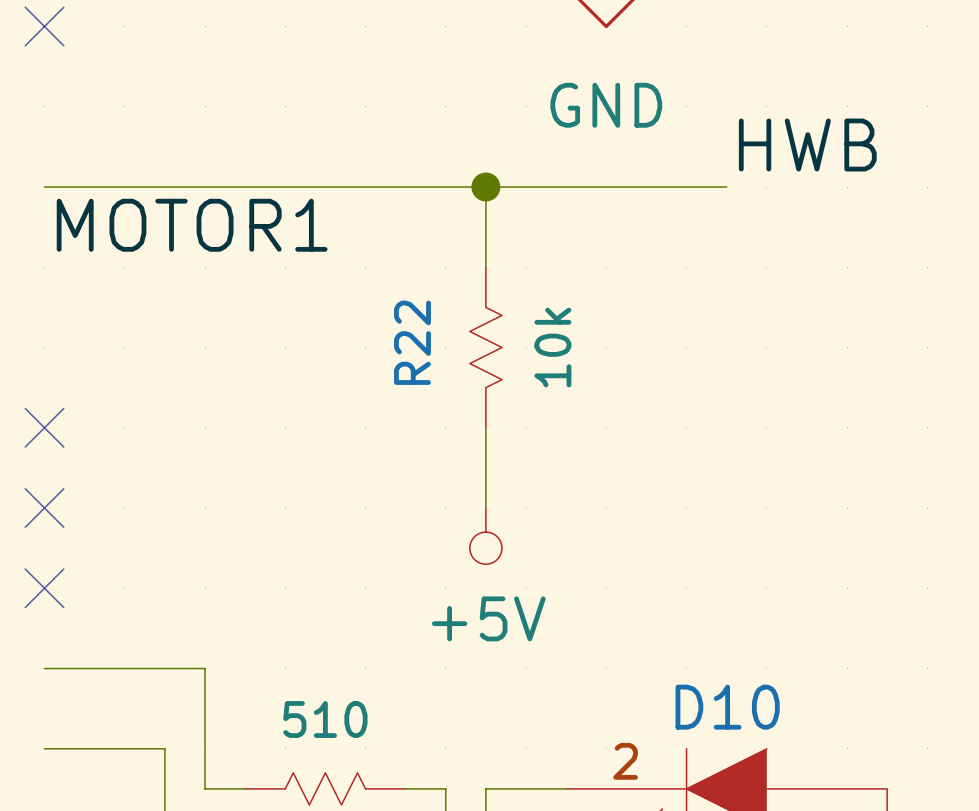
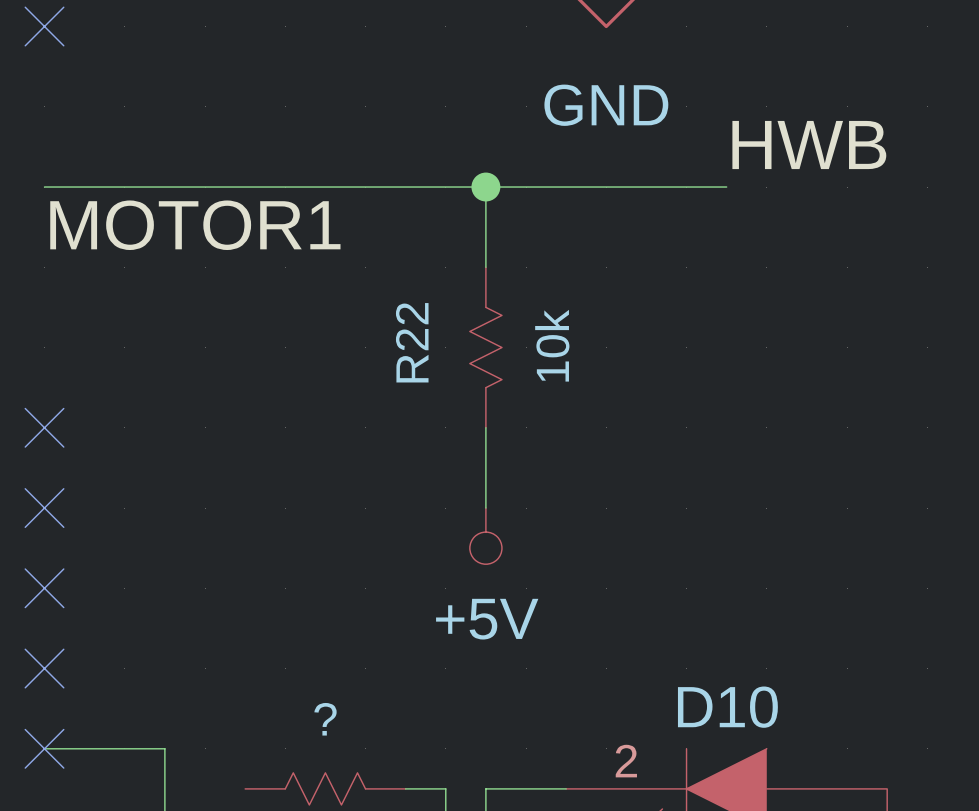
wire: (44, 668) (205, 668) (205, 788) (245, 788) -> none
no-connect mark: none -> (44, 668)
part value: 510 (325, 719) -> ? (325, 719)
no-connect mark: none -> (44, 748)

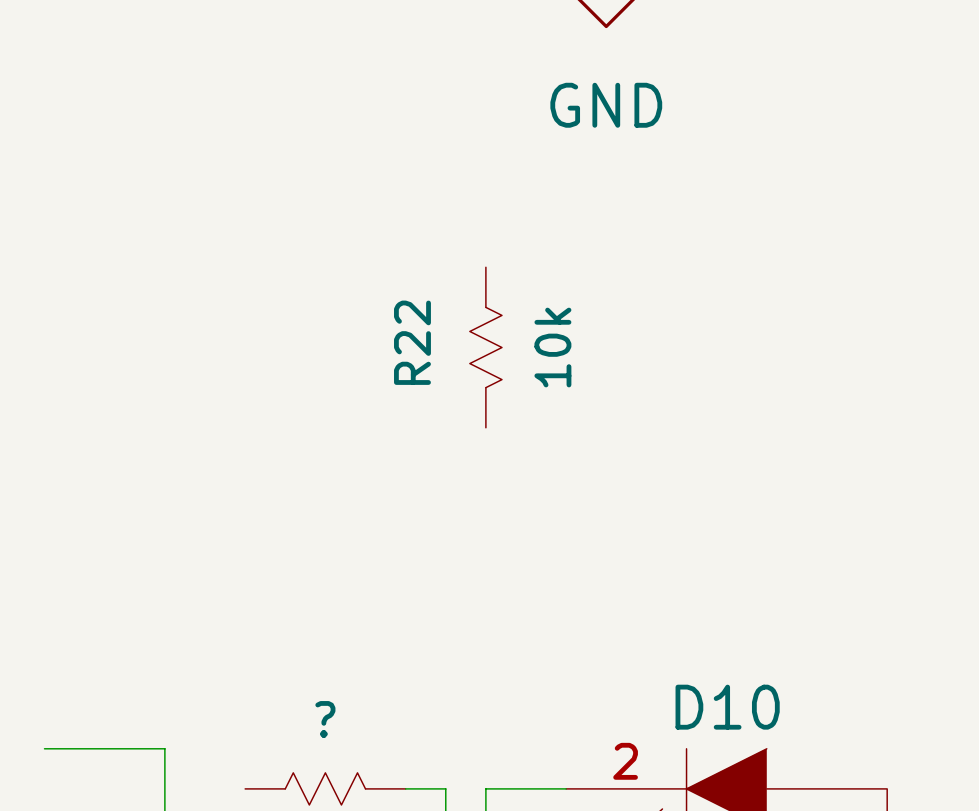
no-connect mark: (44, 26) -> none
label: HWB (809, 145) -> none
wire: (44, 187) (726, 187) -> none
wire: (485, 187) (485, 267) -> none
junction: (485, 187) -> none
label: MOTOR1 (195, 225) -> none
no-connect mark: (44, 427) -> none
wire: (485, 427) (485, 508) -> none
no-connect mark: (44, 508) -> none
power symbol: +5V (485, 536) -> none
no-connect mark: (44, 588) -> none
no-connect mark: (44, 668) -> none
no-connect mark: (44, 748) -> none

